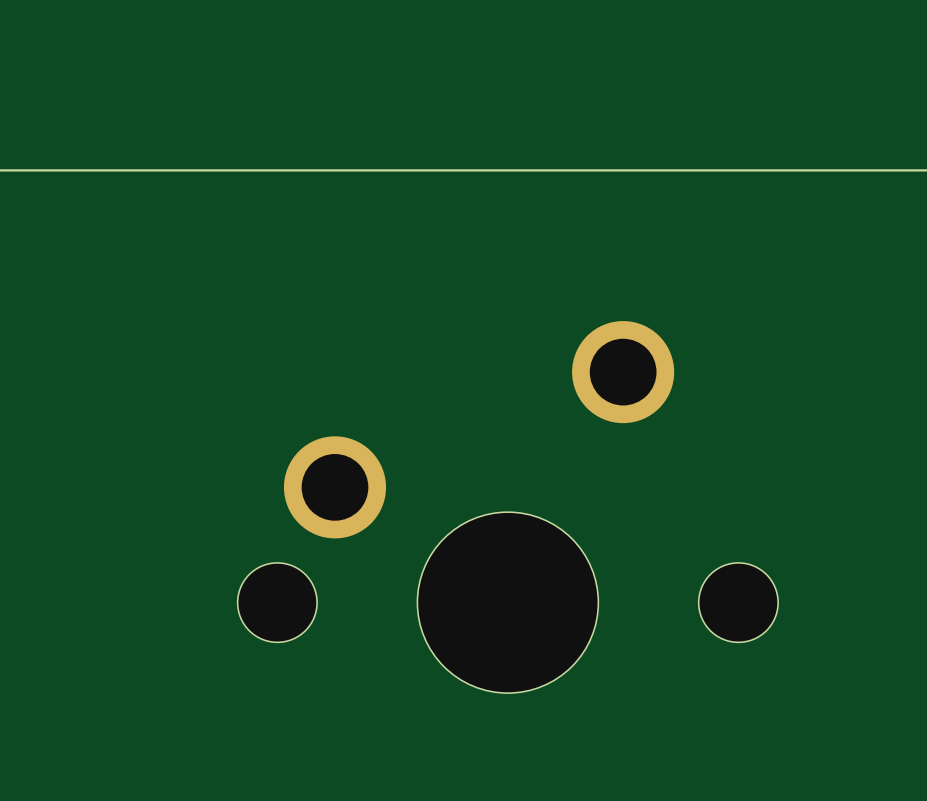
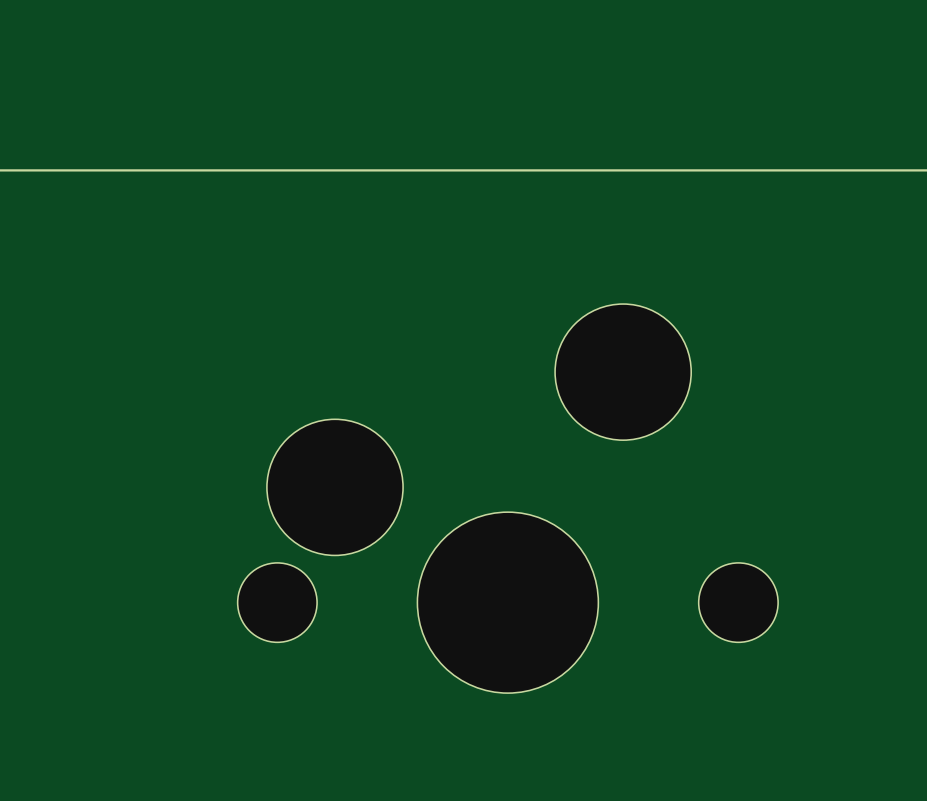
part footprint: [237, 321, 779, 694] -> [237, 304, 779, 694]

